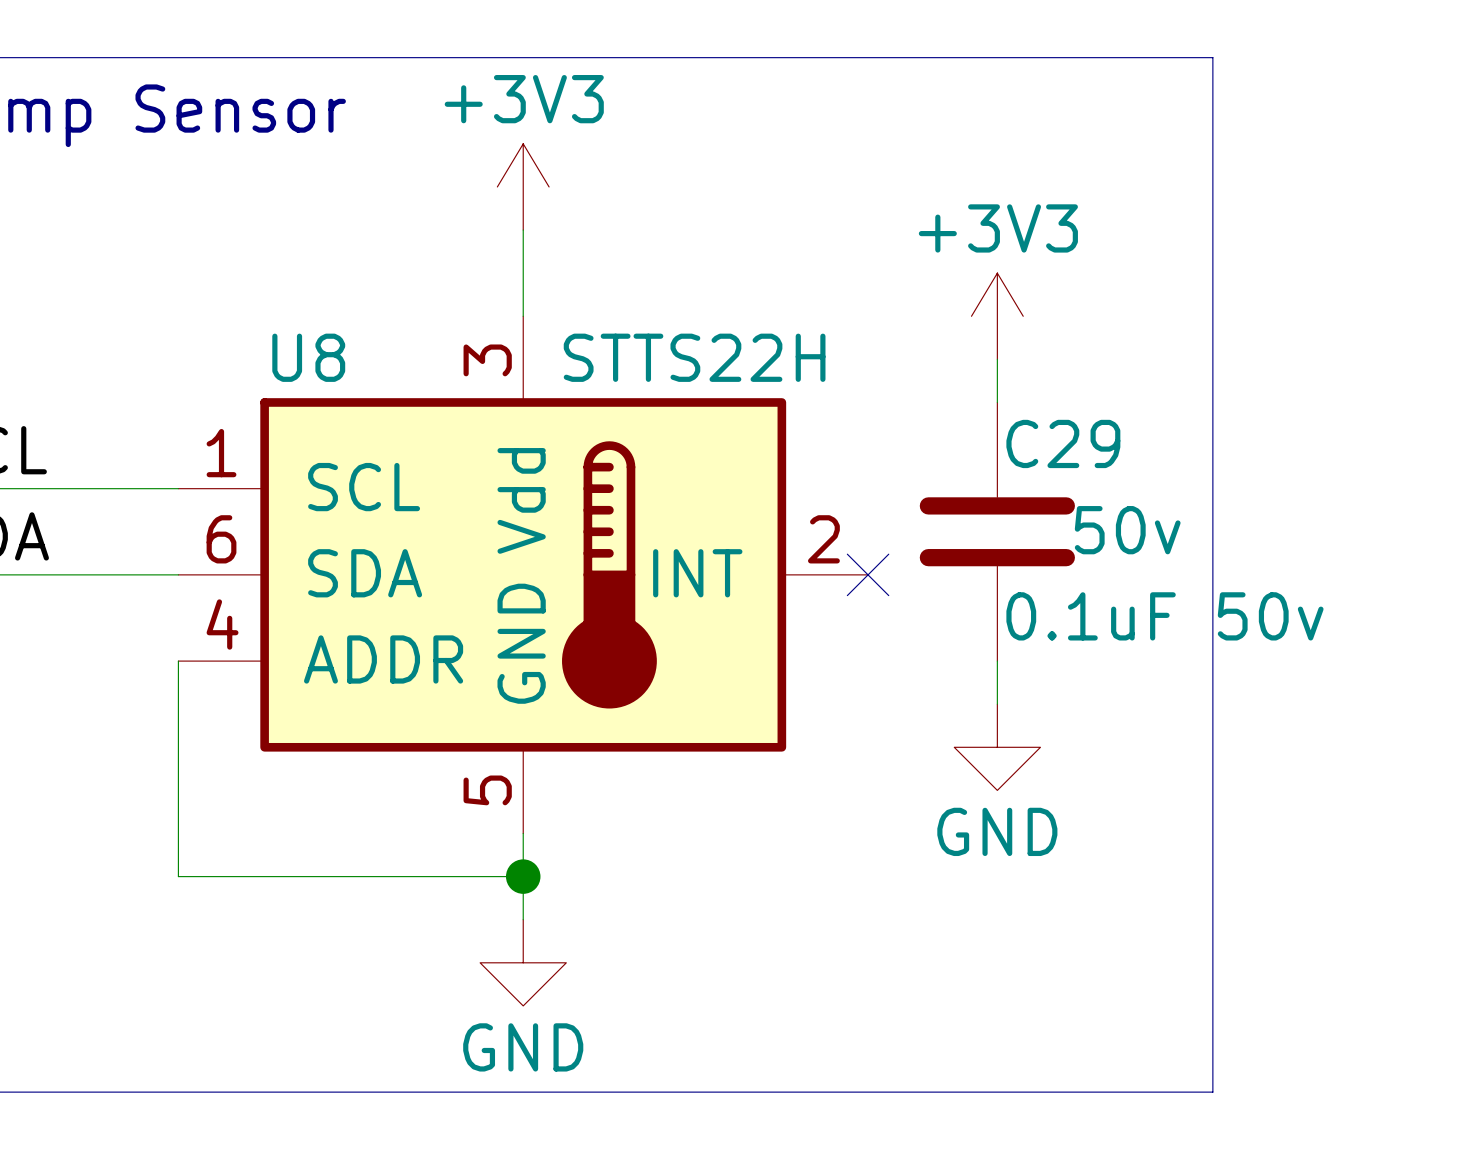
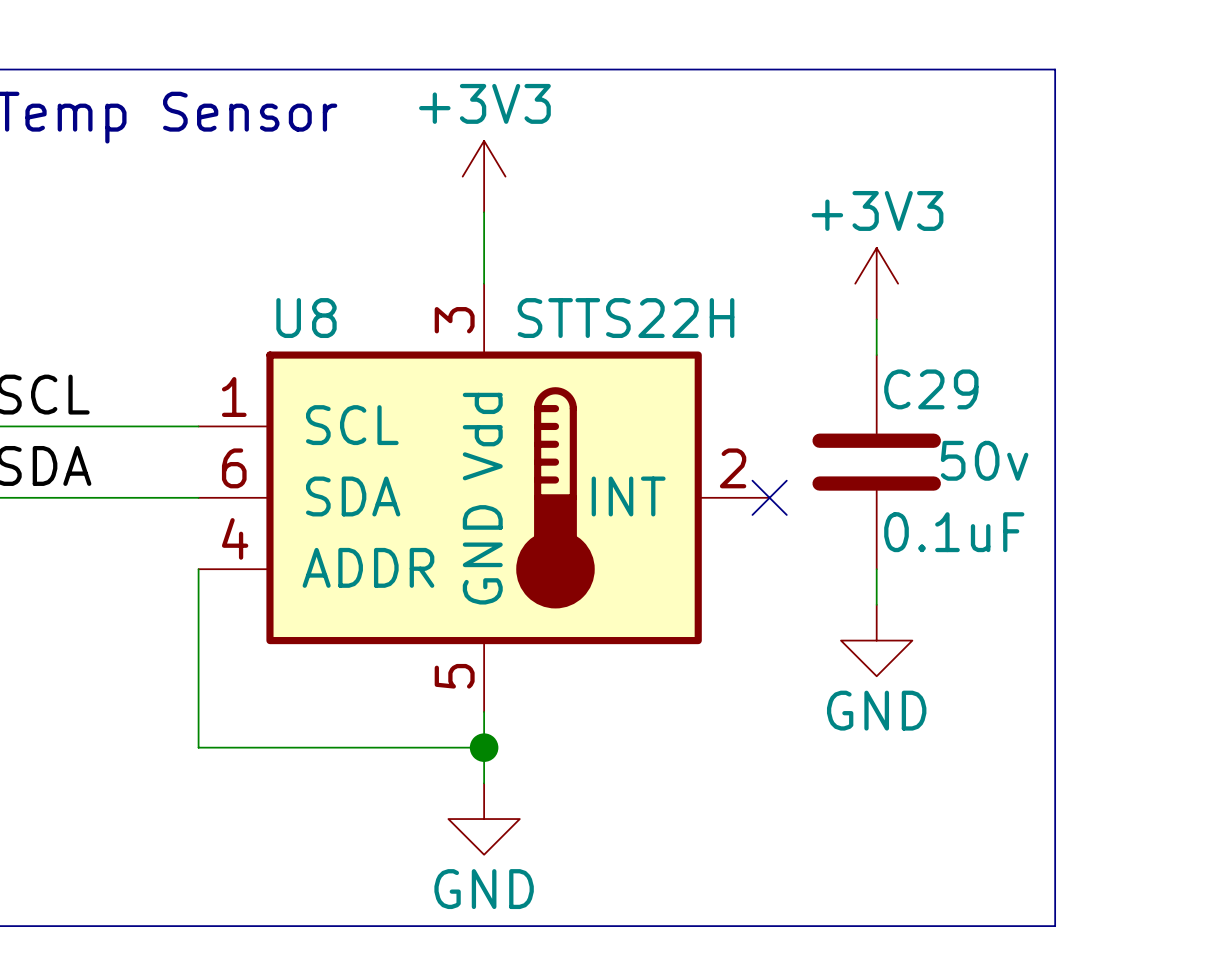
C29 value: 0.1uF 50v (1164, 616) -> 0.1uF (954, 532)

